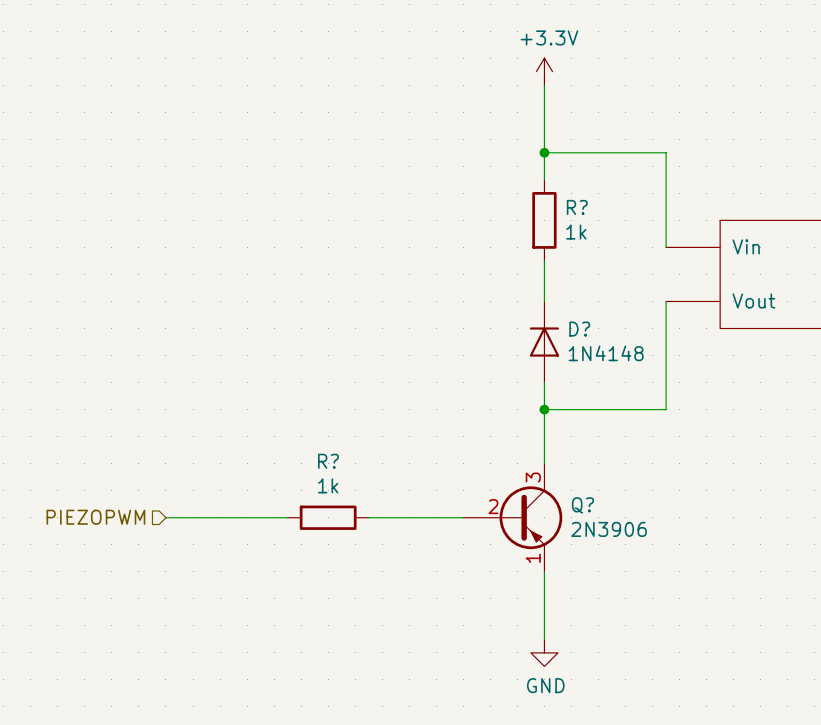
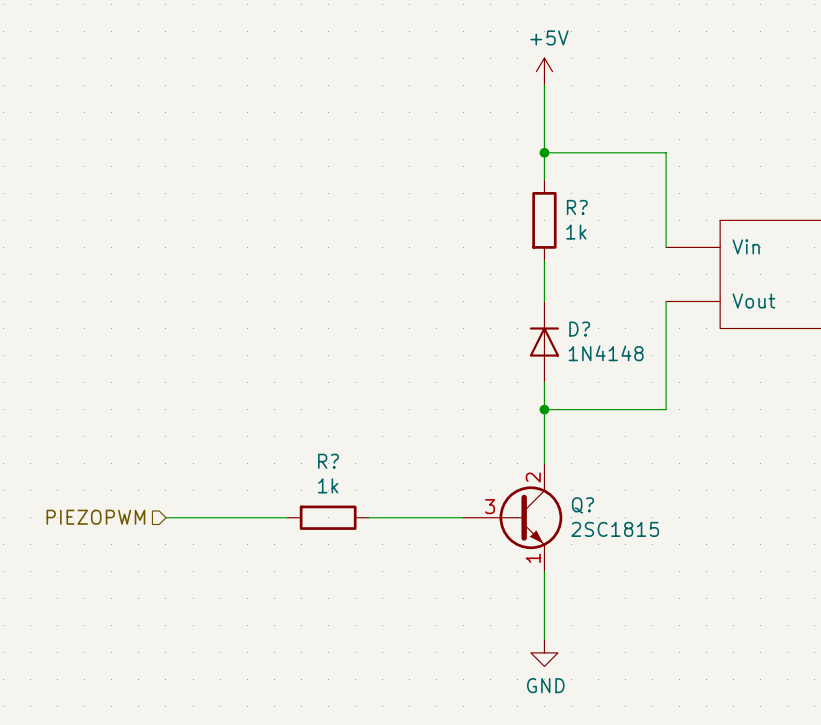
power symbol: +3.3V (544, 71) -> +5V (544, 71)
Q? symbol: [463, 463, 563, 572] -> [463, 463, 563, 572]
Q? value: 2N3906 (609, 529) -> 2SC1815 (615, 529)

